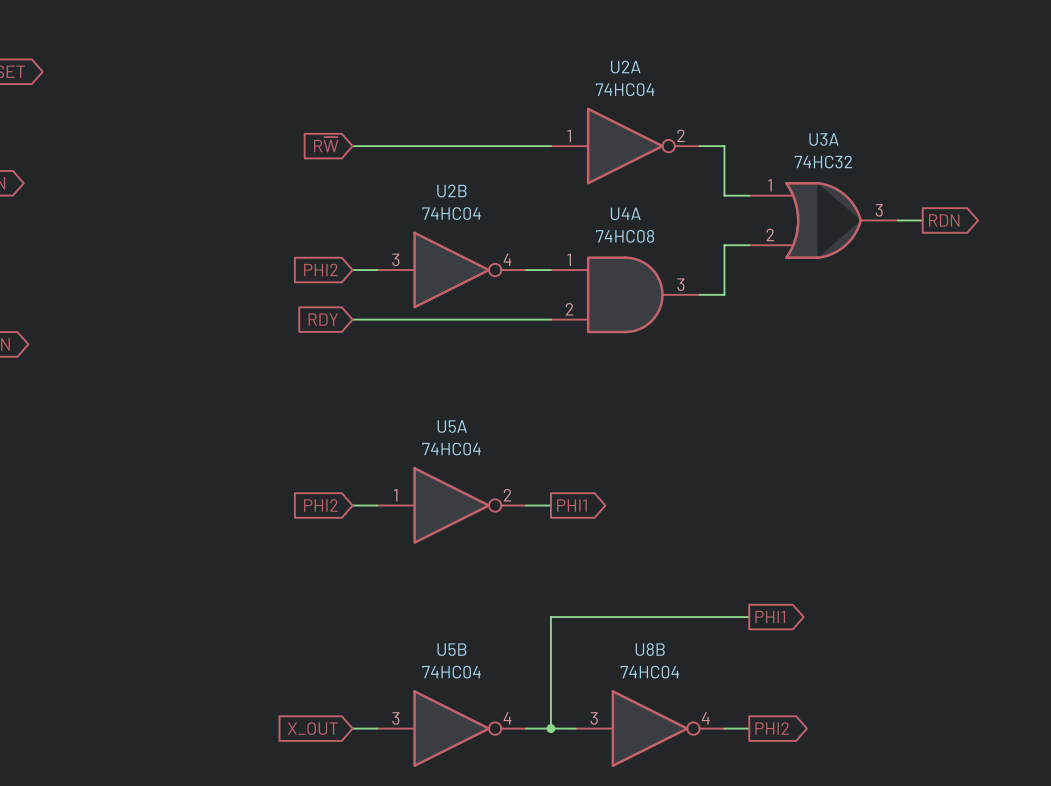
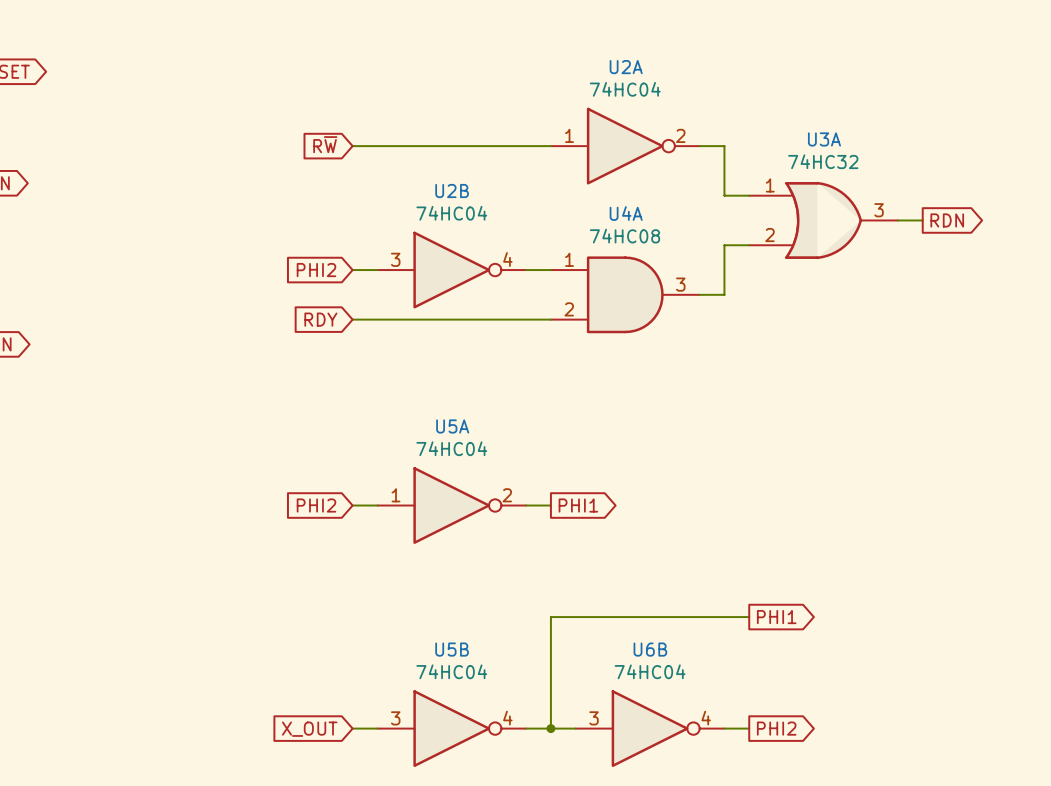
U8B name: U8B (650, 649) -> U6B (650, 649)

